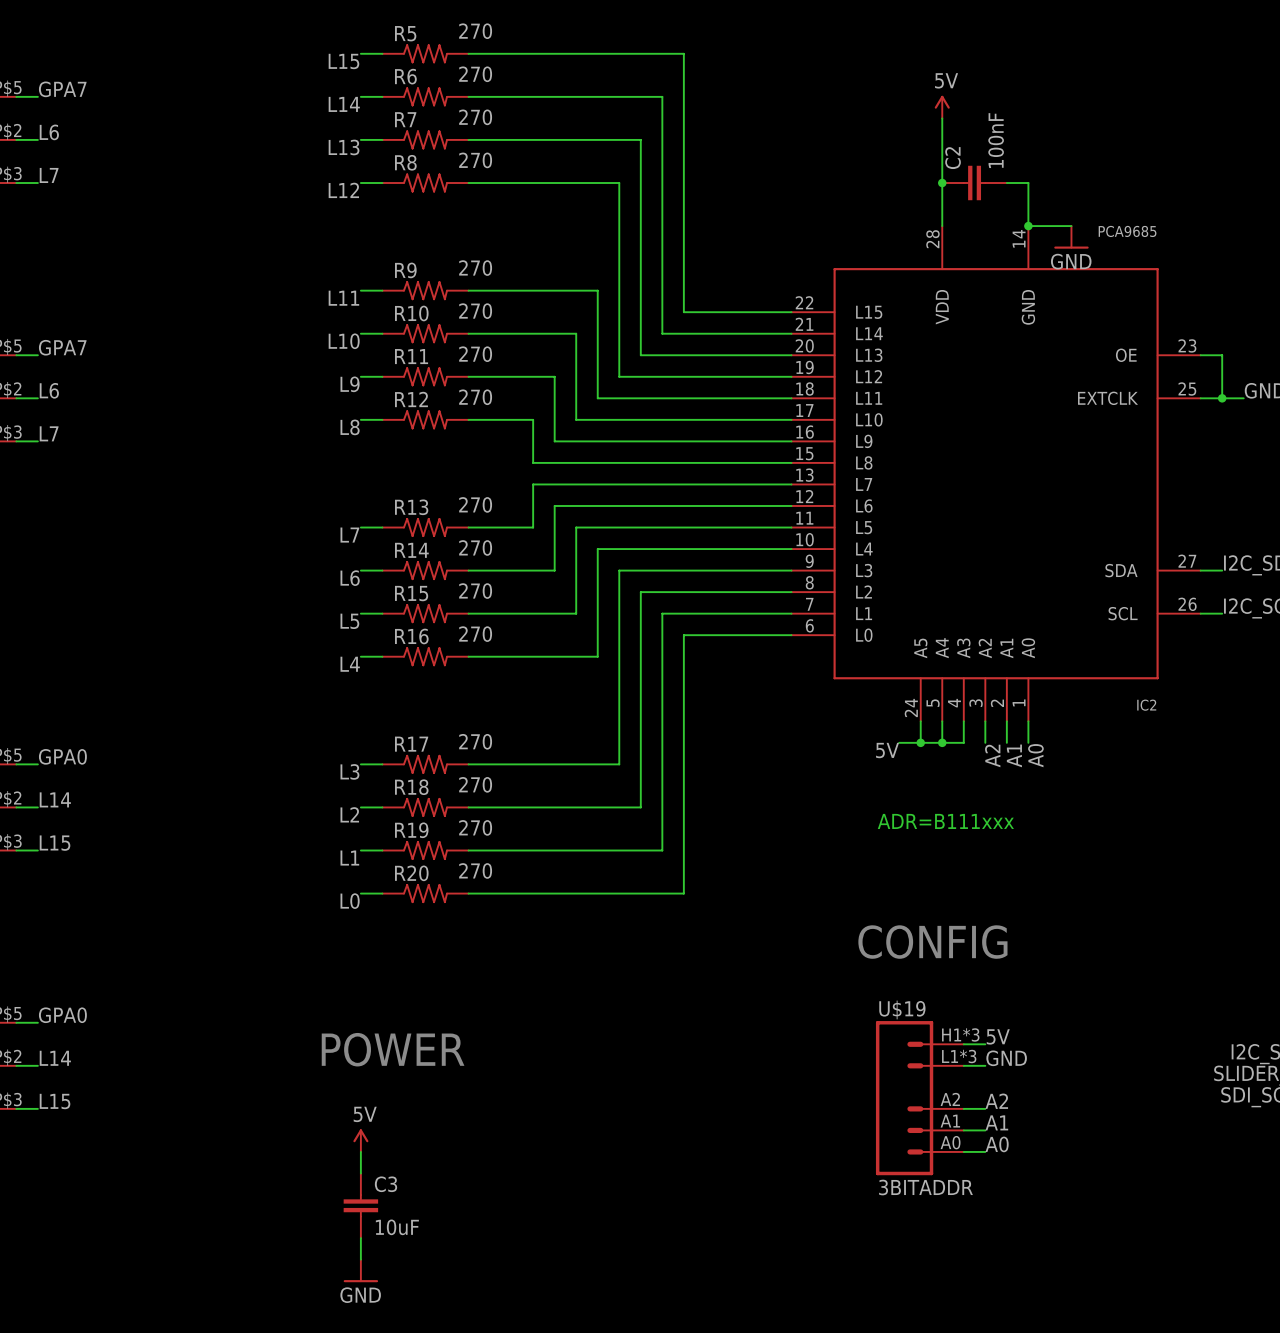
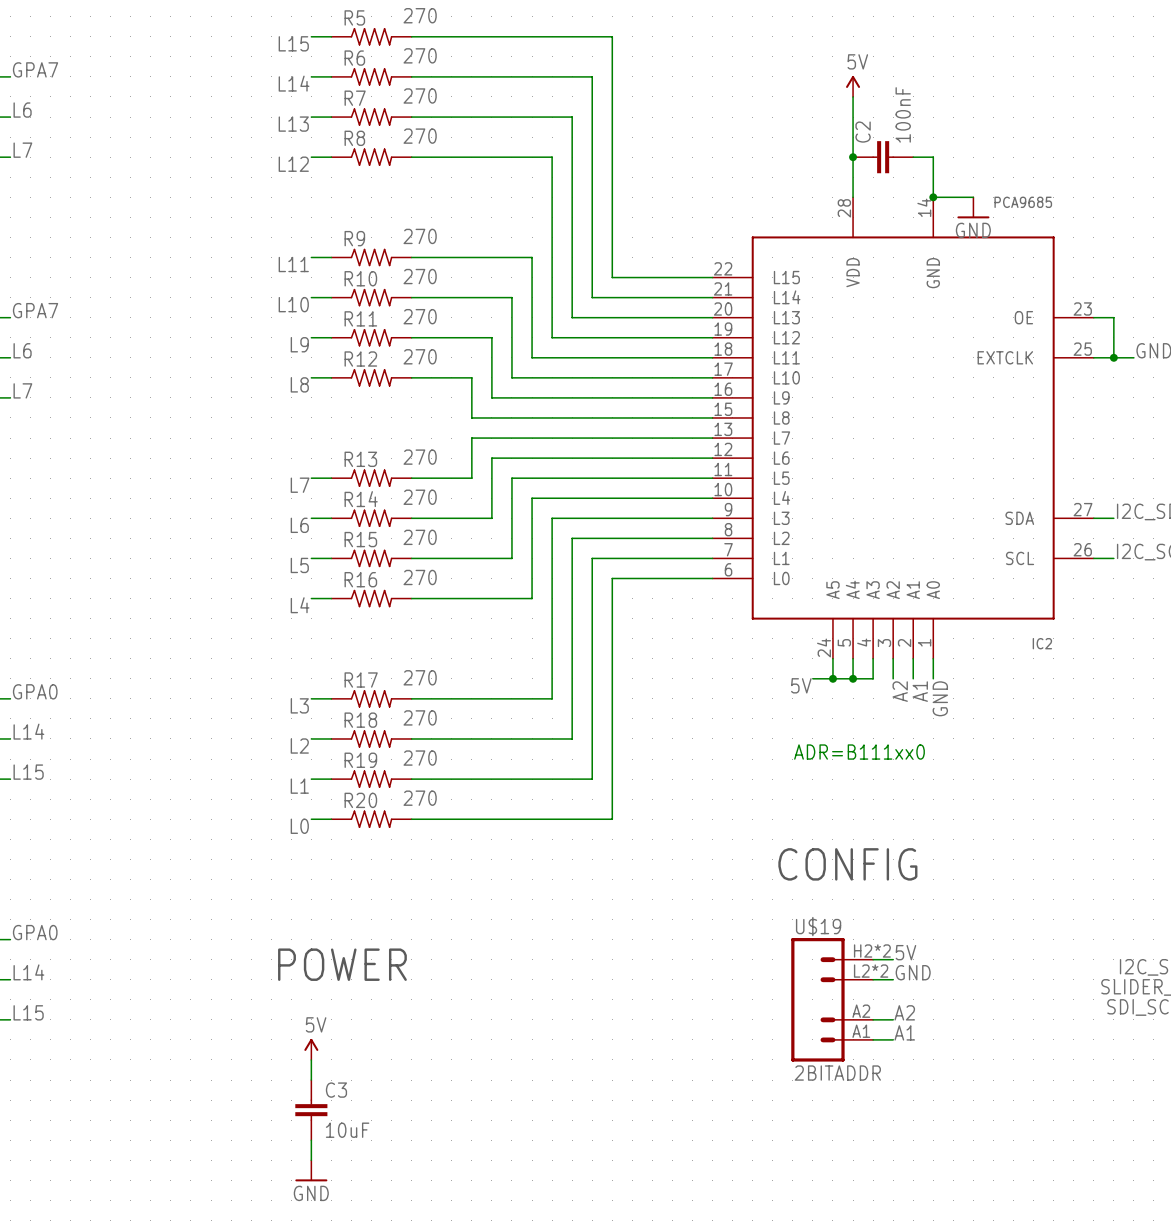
label: A0 (1035, 755) -> GND (940, 698)
text: ADR=B111xxx (945, 821) -> ADR=B111xx0 (859, 752)
U$19 symbol: [875, 1021, 964, 1176] -> [791, 938, 874, 1062]
label: A0 (997, 1144) -> none
wire: (963, 1151) (985, 1151) -> none
U$19 value: 3BITADDR (925, 1187) -> 2BITADDR (837, 1073)

